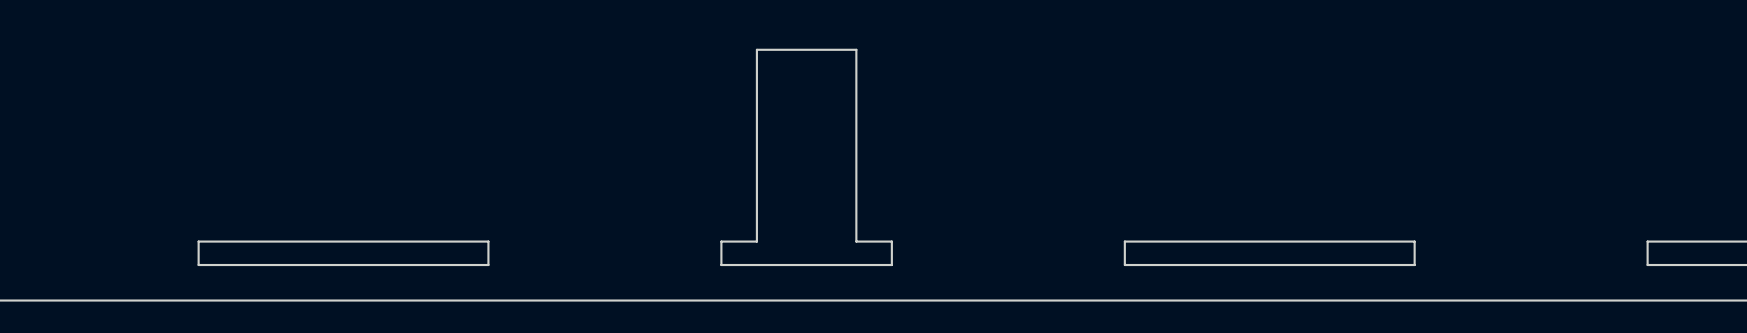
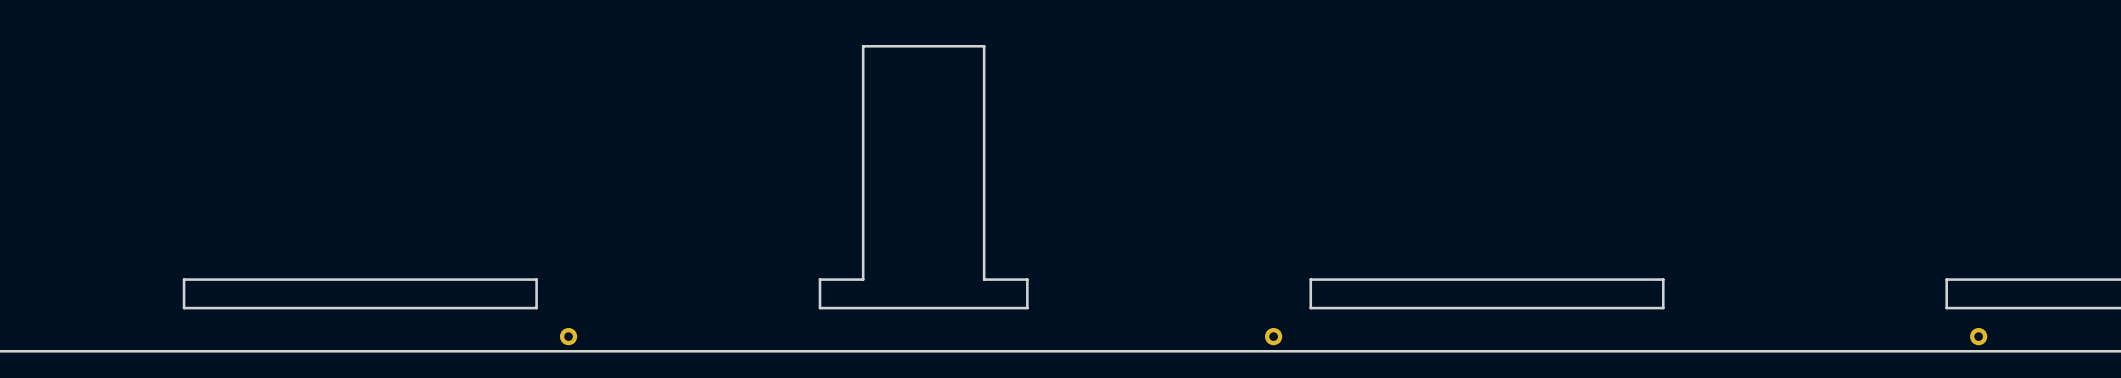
part: none -> (568, 336)
part: none -> (1273, 336)
part: none -> (1978, 336)

